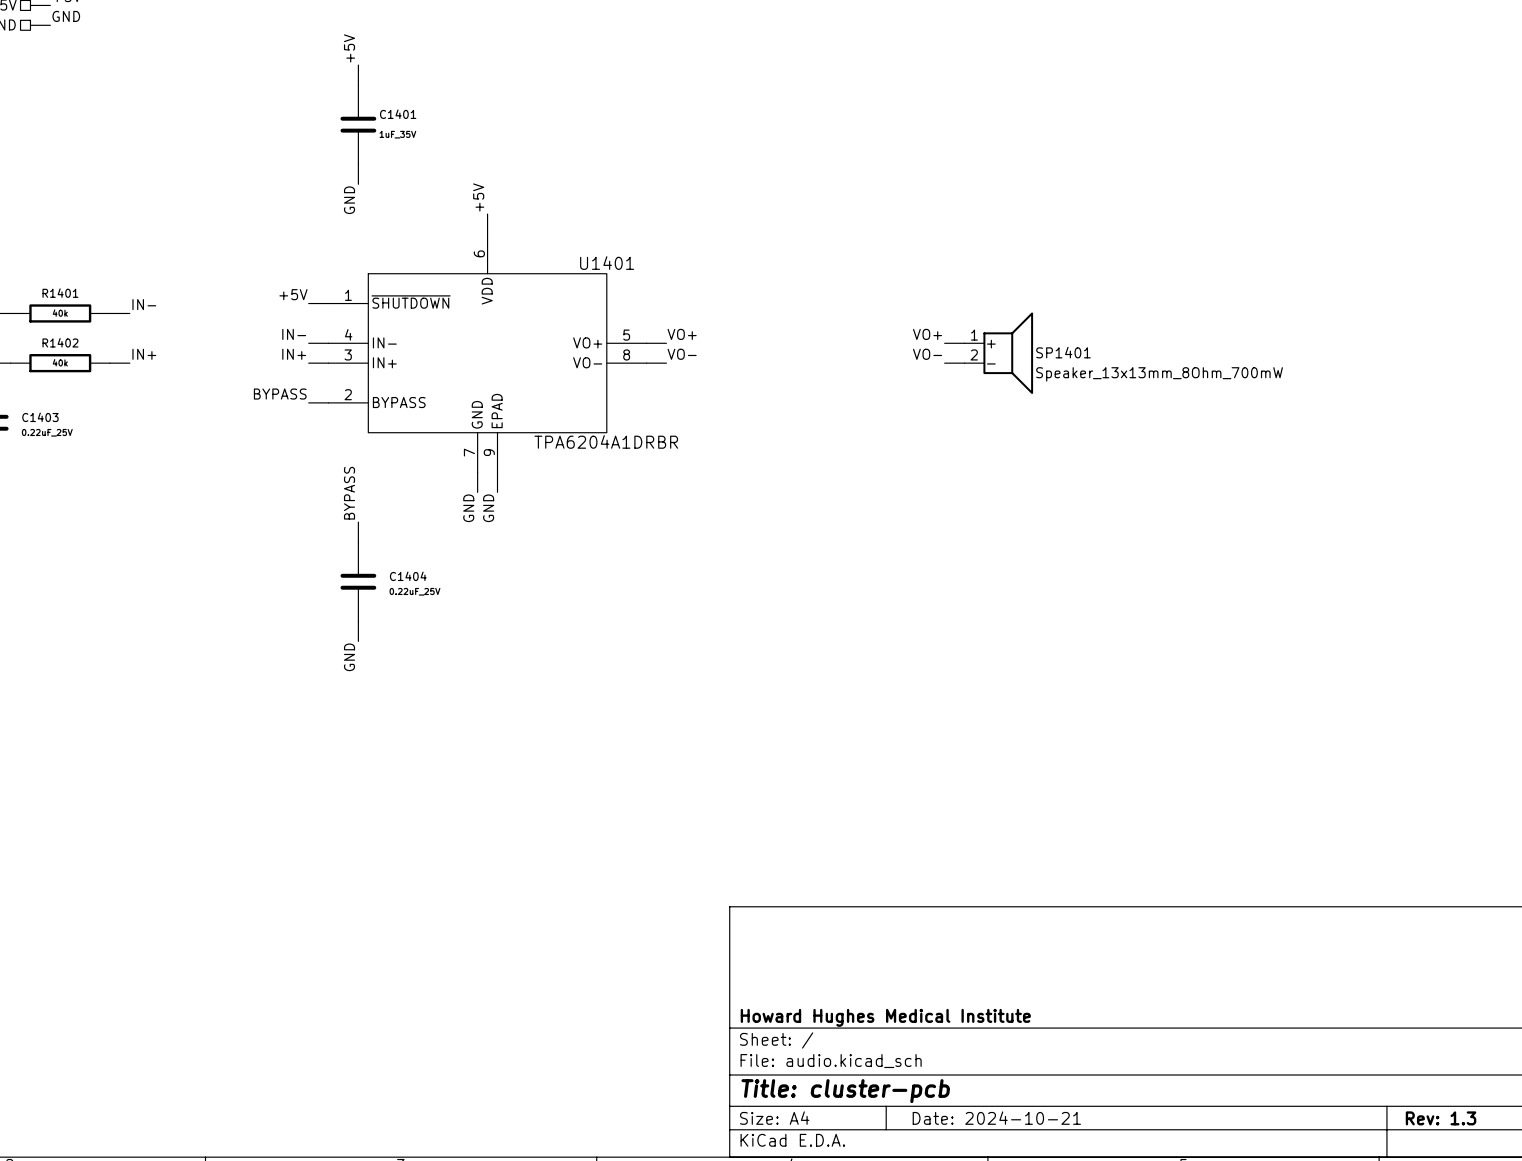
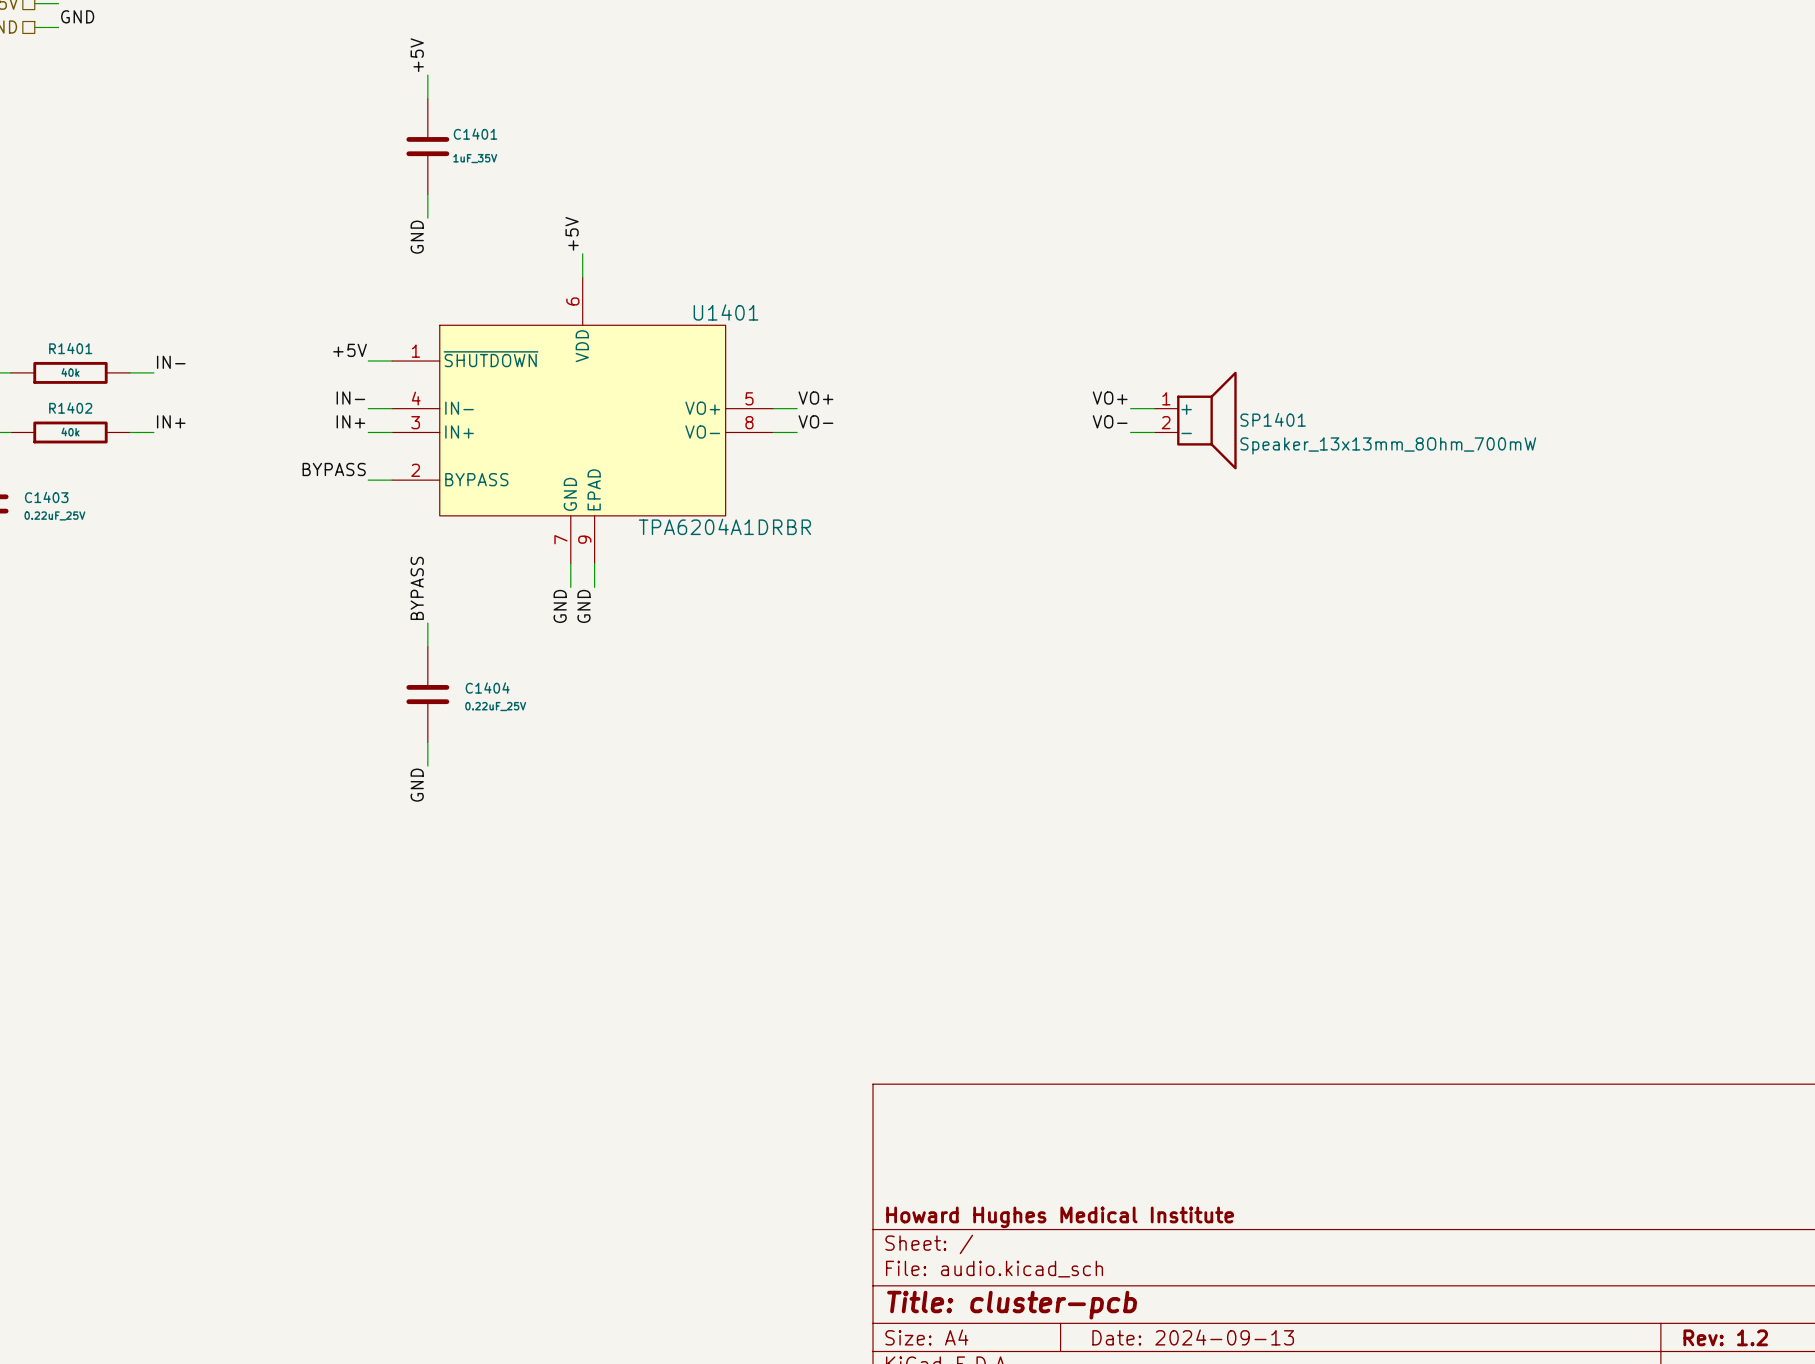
title block: Date: 2024-10-21 (996, 1118) -> Date: 2024-09-13 (1193, 1337)
title block: Rev: 1.3 (1441, 1118) -> Rev: 1.2 (1725, 1337)

